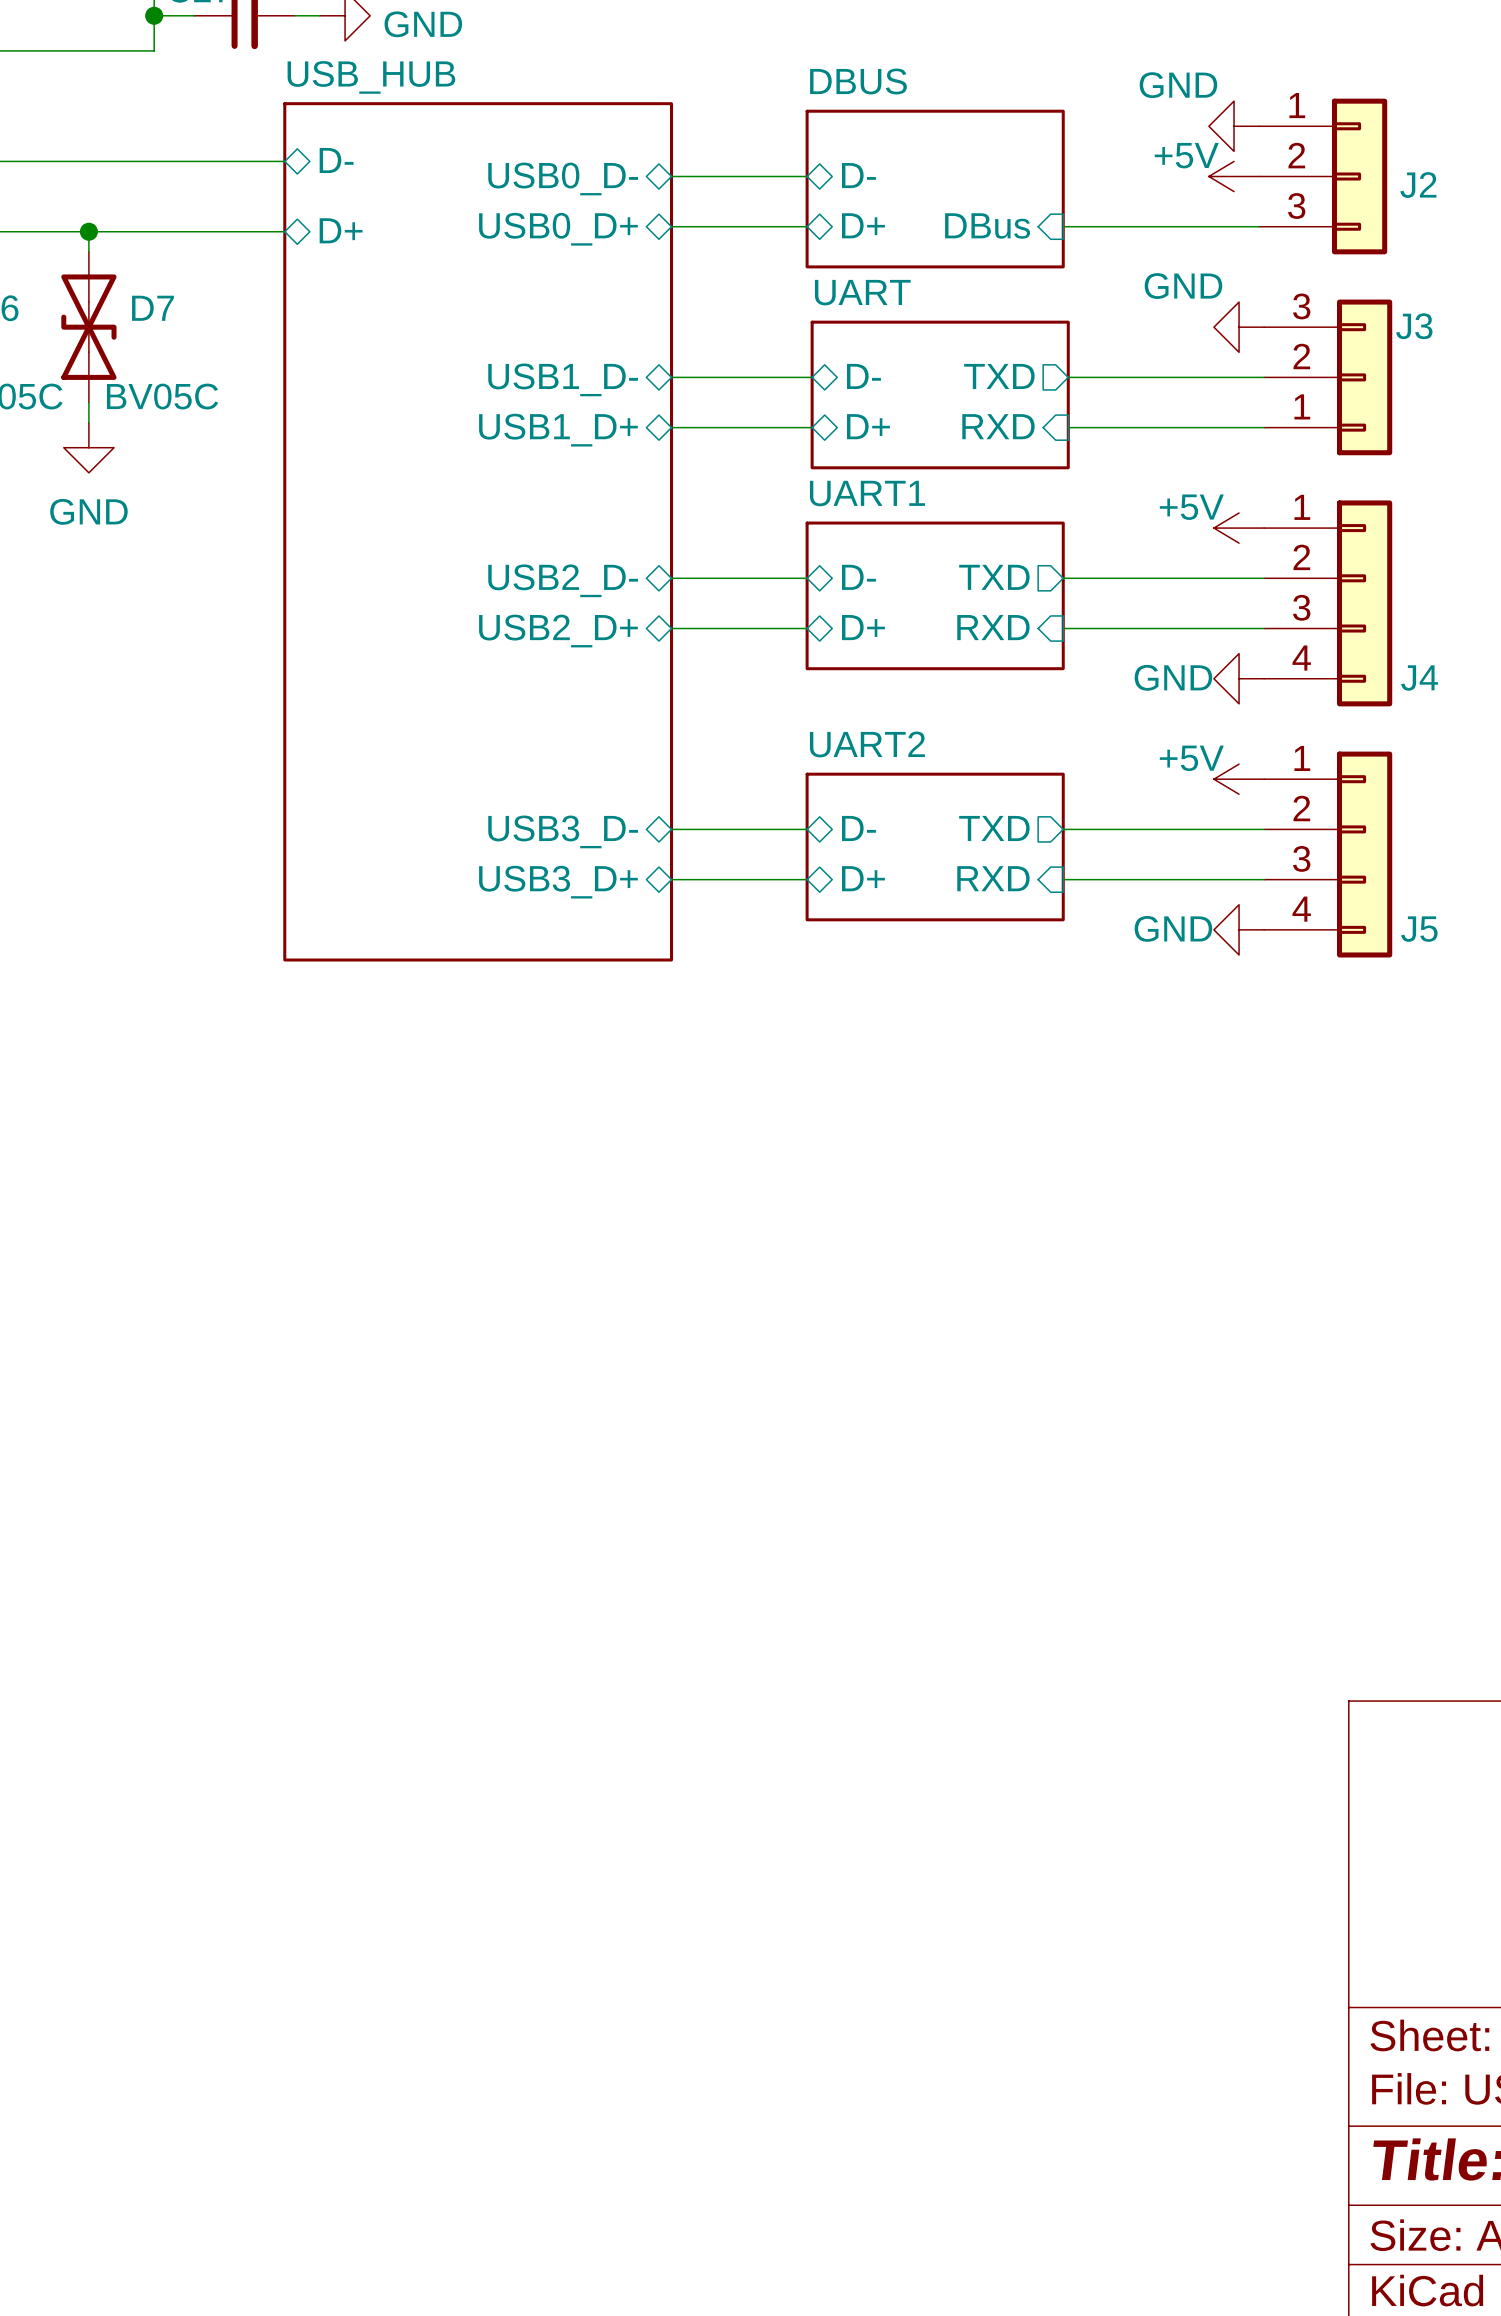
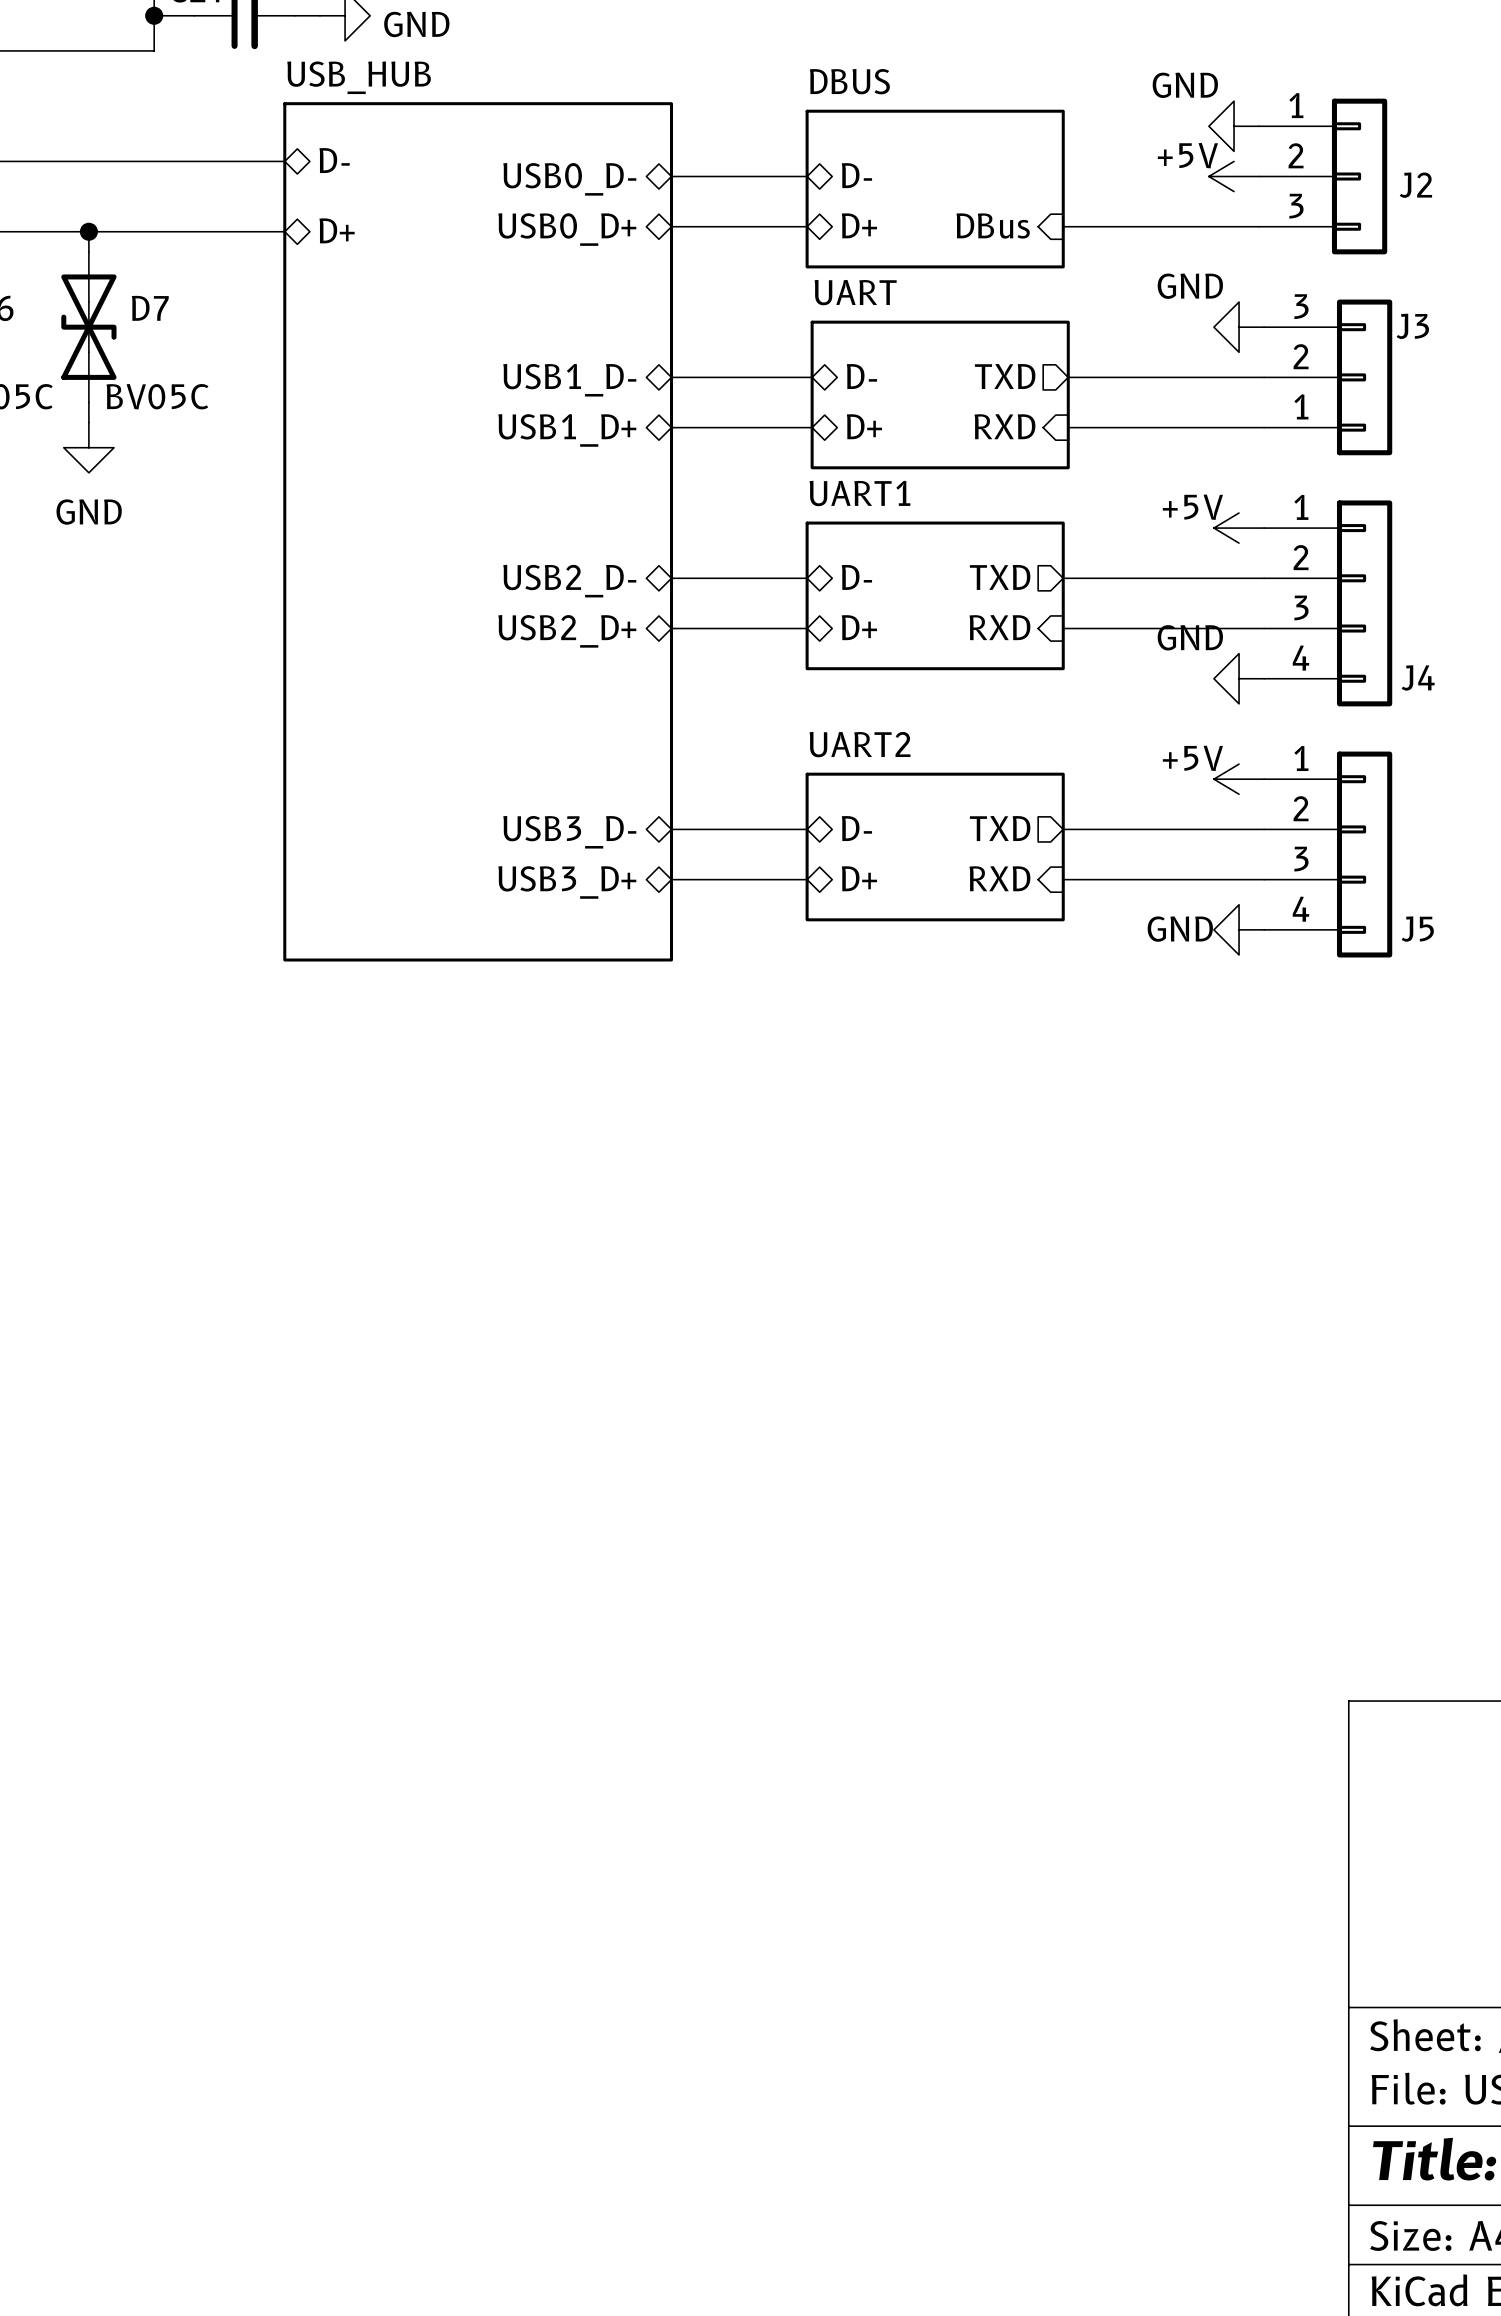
power symbol text position: GND (1173, 677) -> GND (1190, 637)

